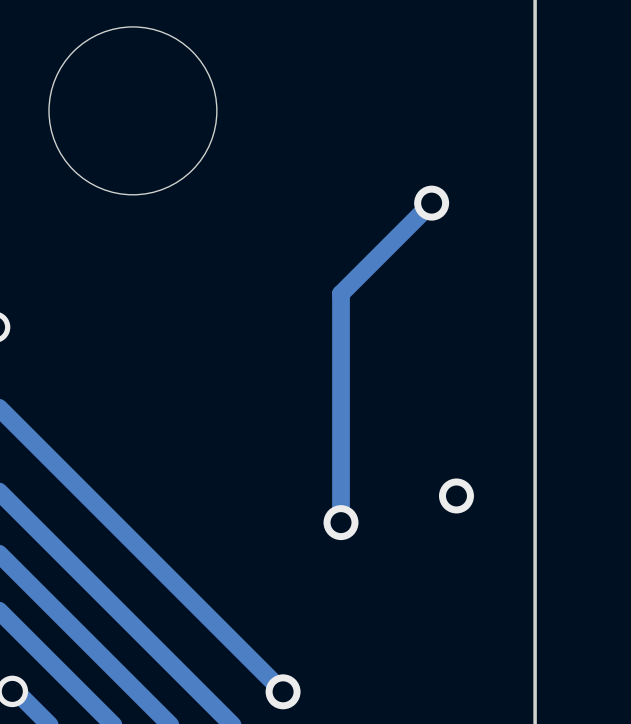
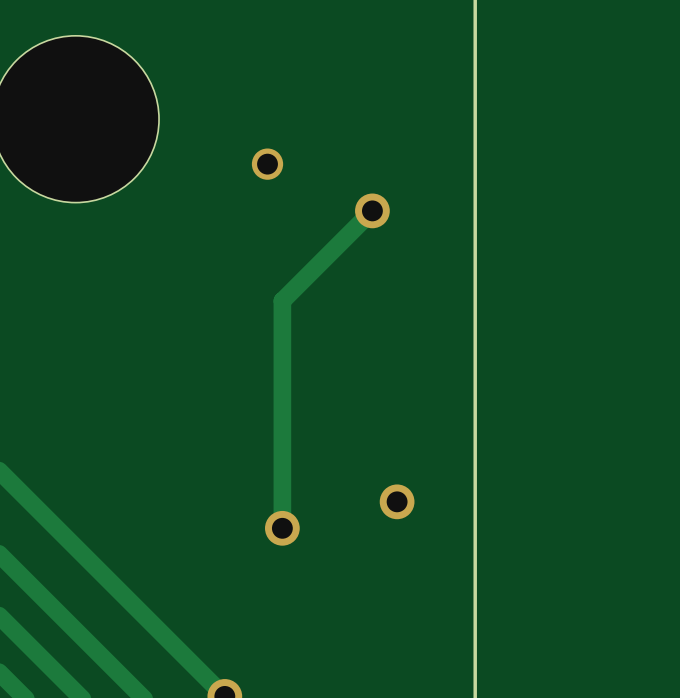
via: none -> (267, 164)

